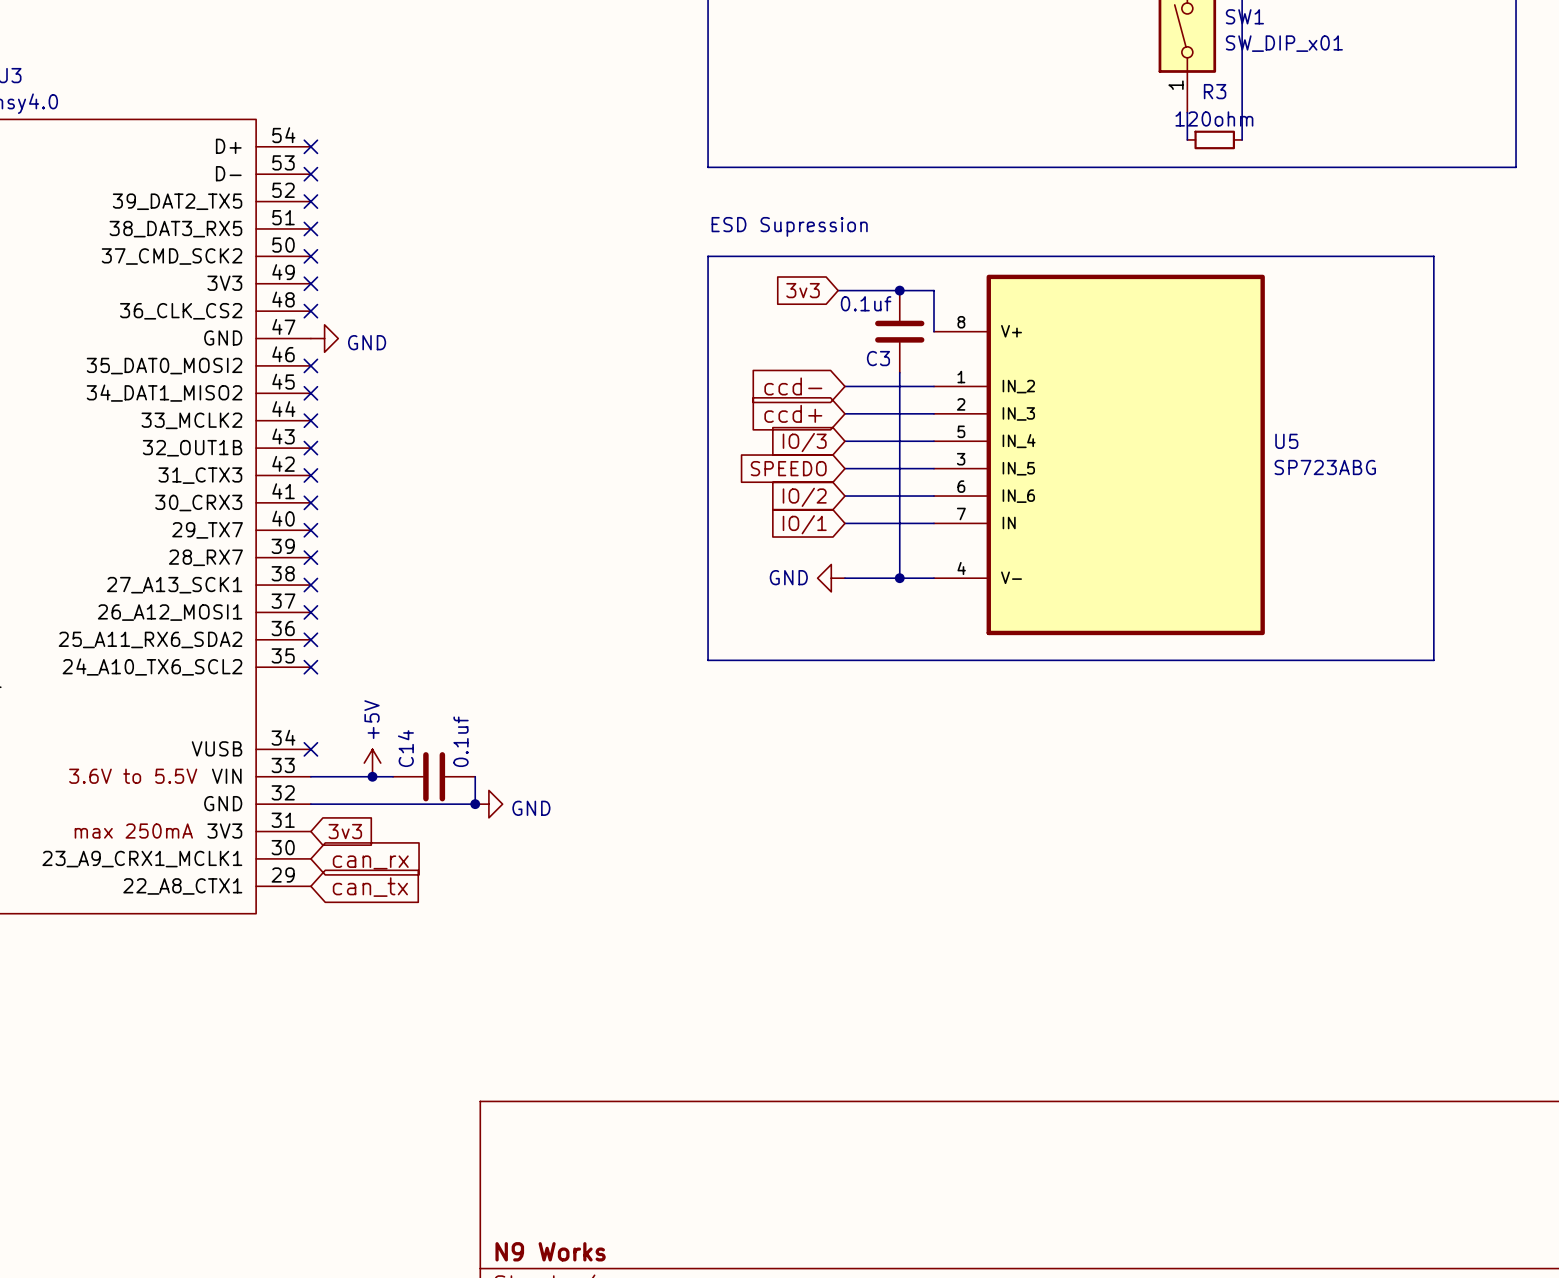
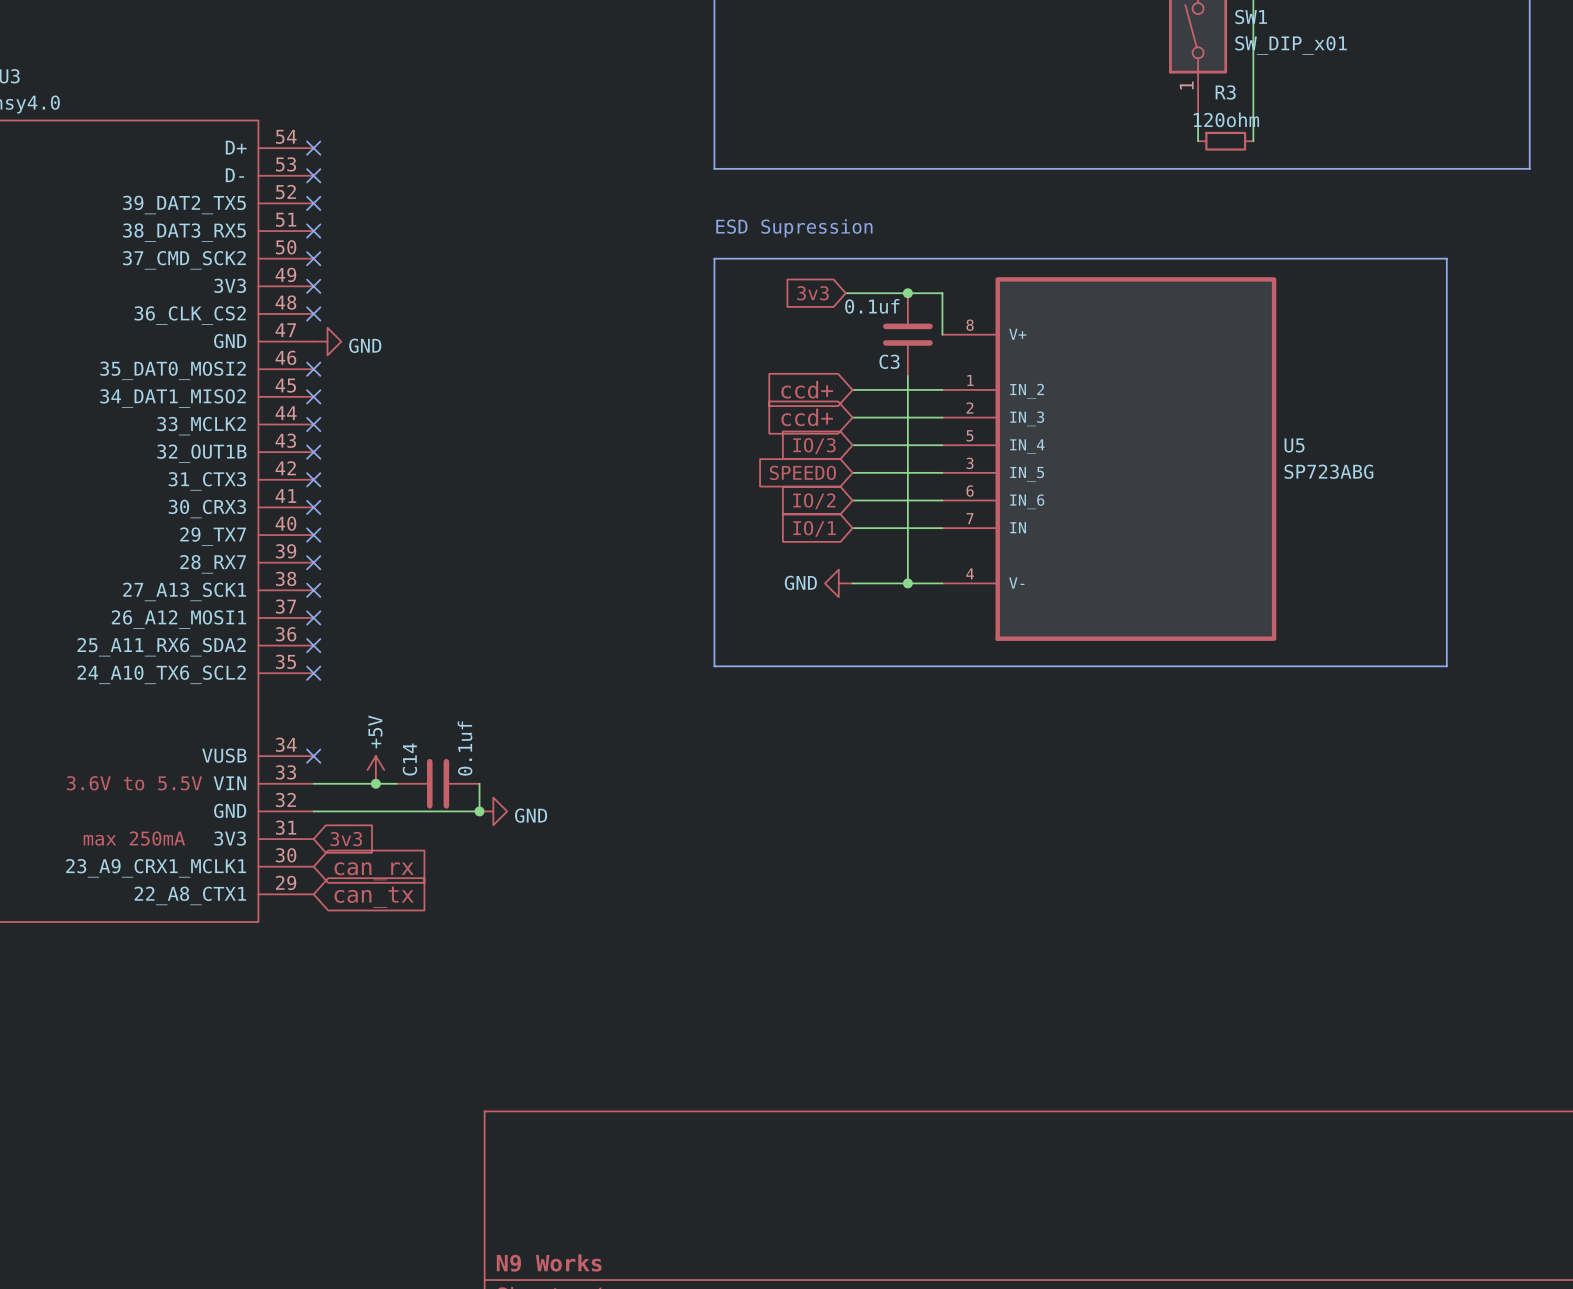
global label: ccd- (793, 386) -> ccd+ (807, 389)

